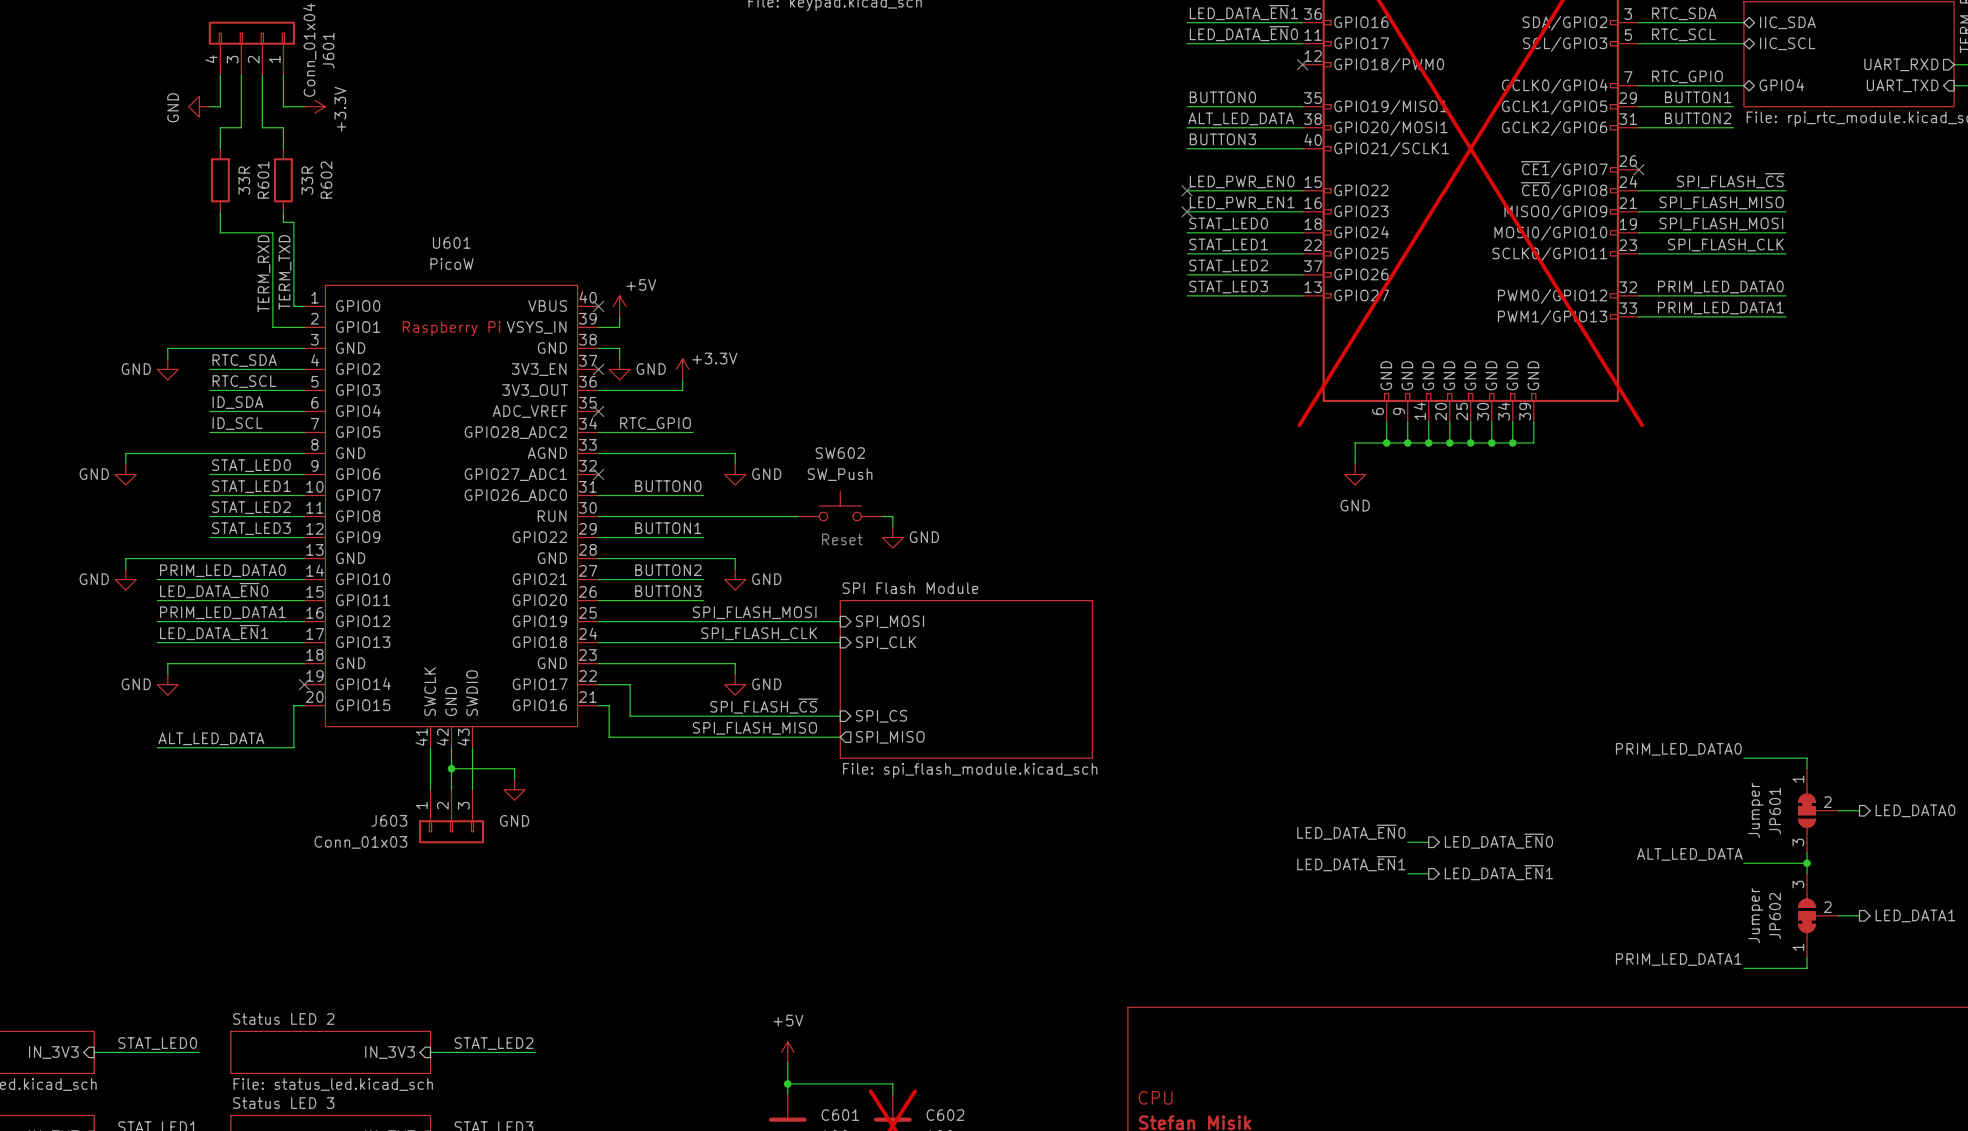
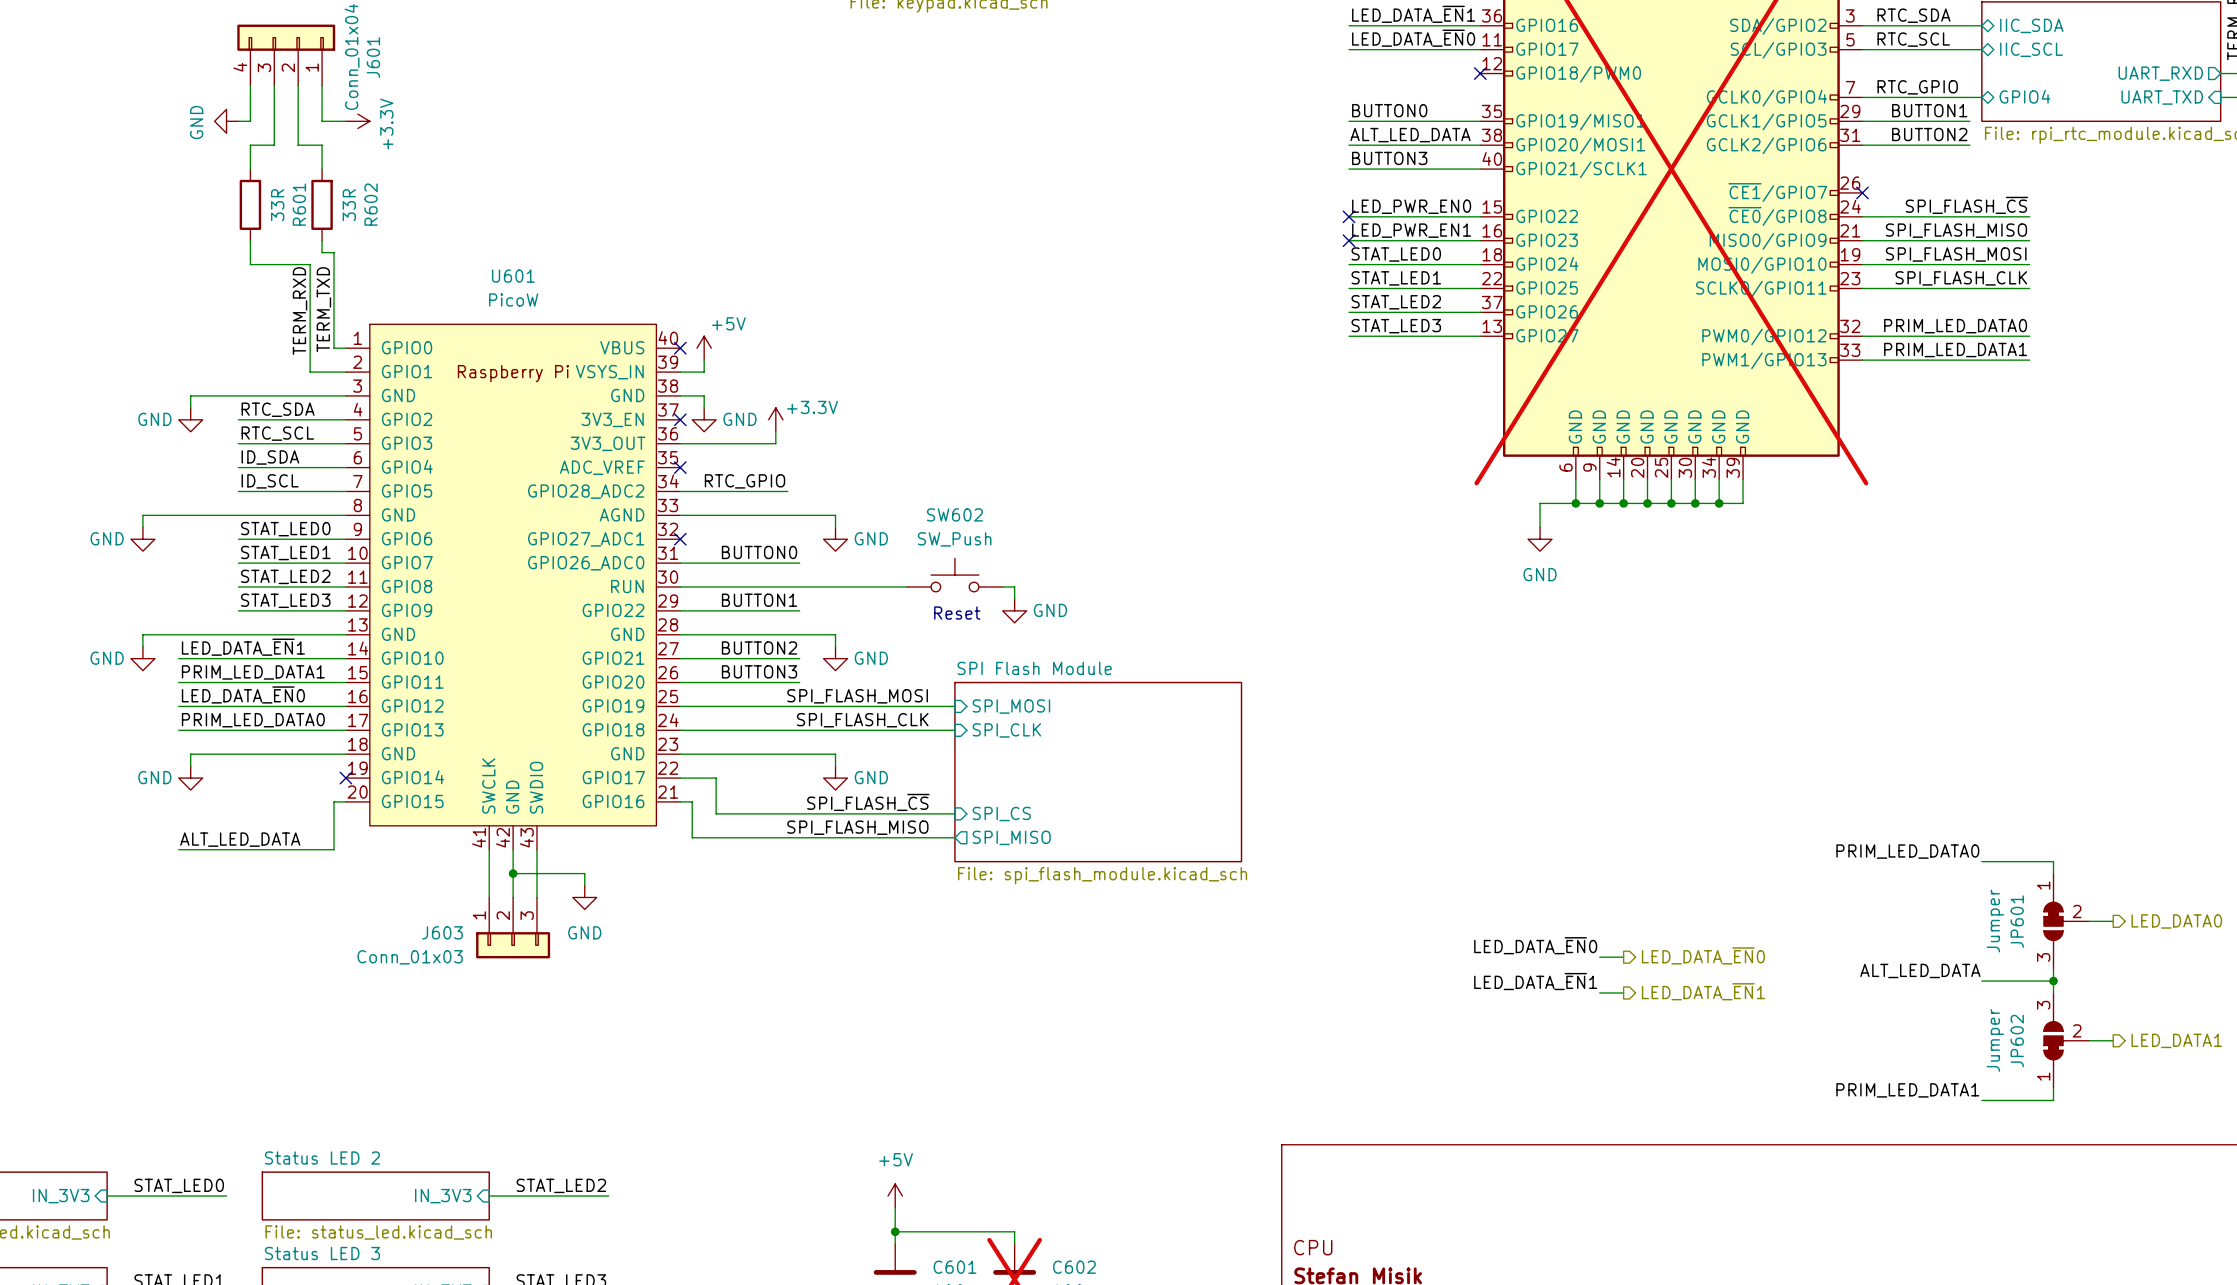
label: PRIM_LED_DATA0 (222, 570) -> LED_DATA_~{EN}1 (243, 647)
label: LED_DATA_~{EN}0 (214, 590) -> PRIM_LED_DATA1 (253, 672)
label: PRIM_LED_DATA1 (222, 612) -> LED_DATA_~{EN}0 (243, 694)
label: LED_DATA_~{EN}1 (214, 632) -> PRIM_LED_DATA0 (253, 720)

